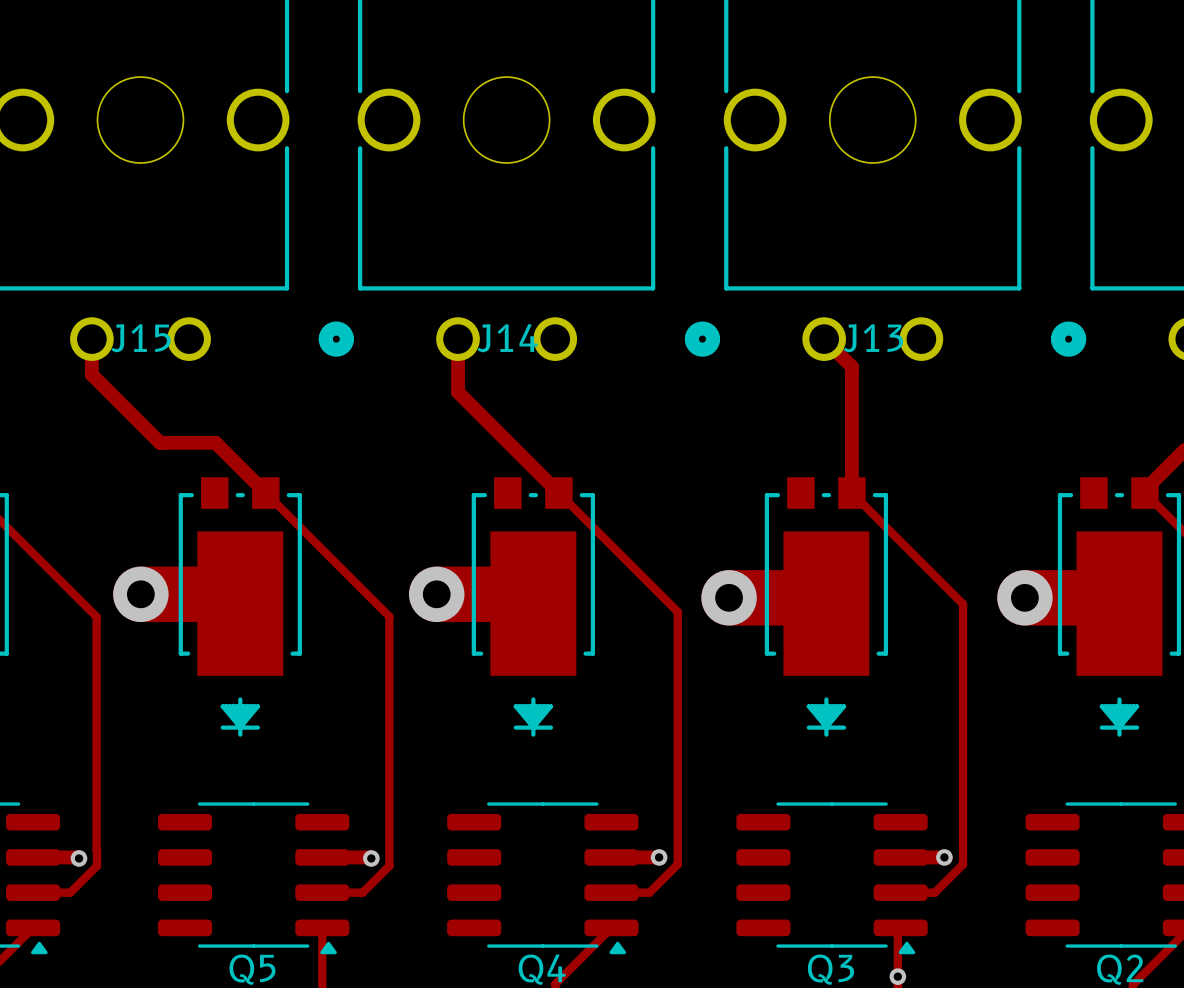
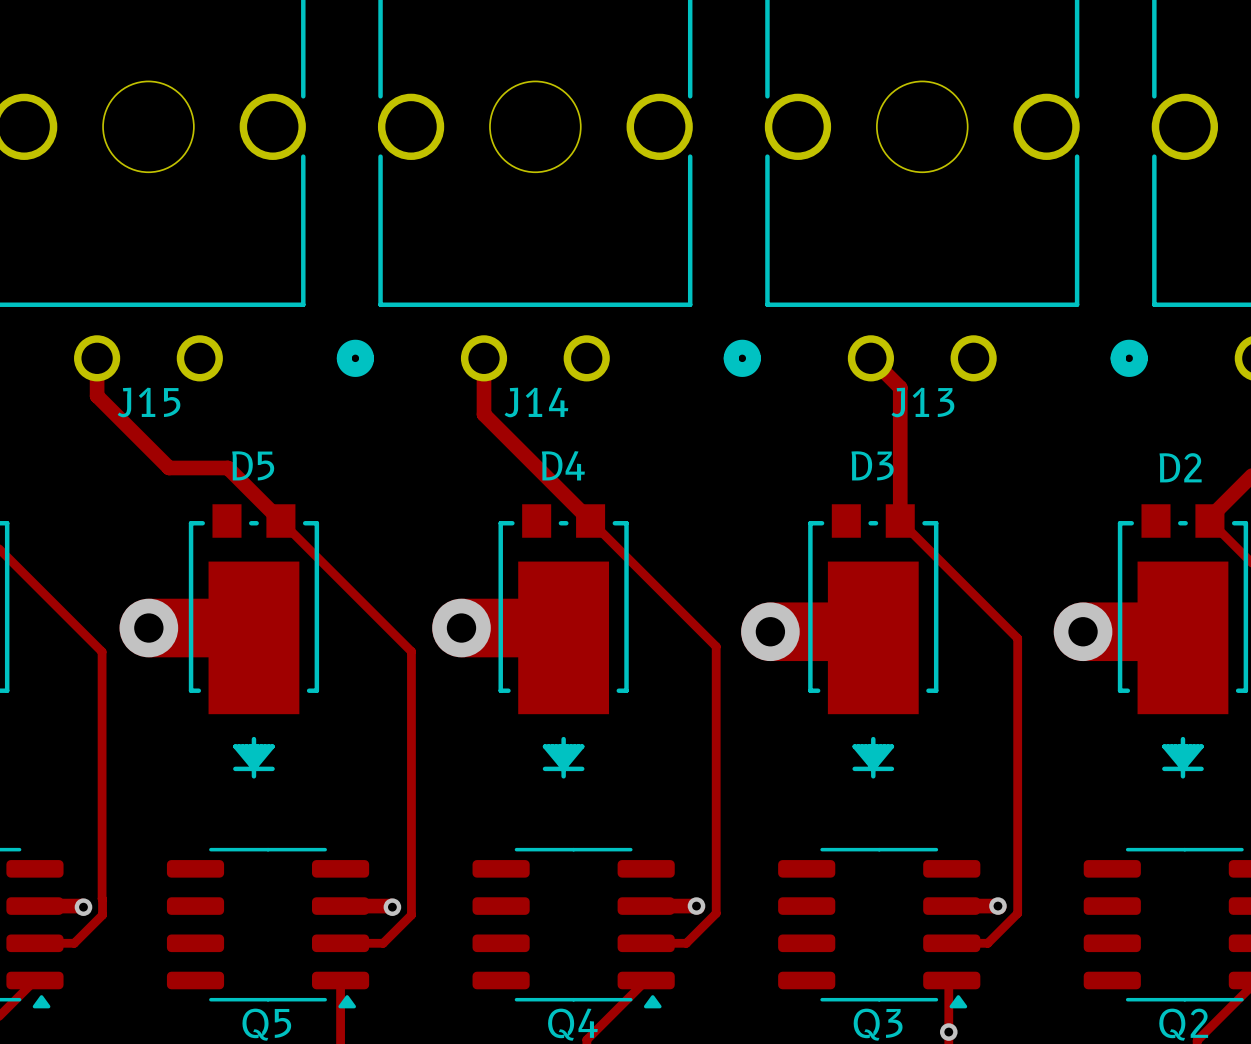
J15 name position: J15 (141, 338) -> J15 (149, 402)
J14 name position: J14 (507, 338) -> J14 (536, 402)
J13 name position: J13 (873, 338) -> J13 (922, 402)
D5 name: none -> D5 (253, 465)
D4 name: none -> D4 (563, 465)
D3 name: none -> D3 (872, 465)
D2 name: none -> D2 (1180, 467)

